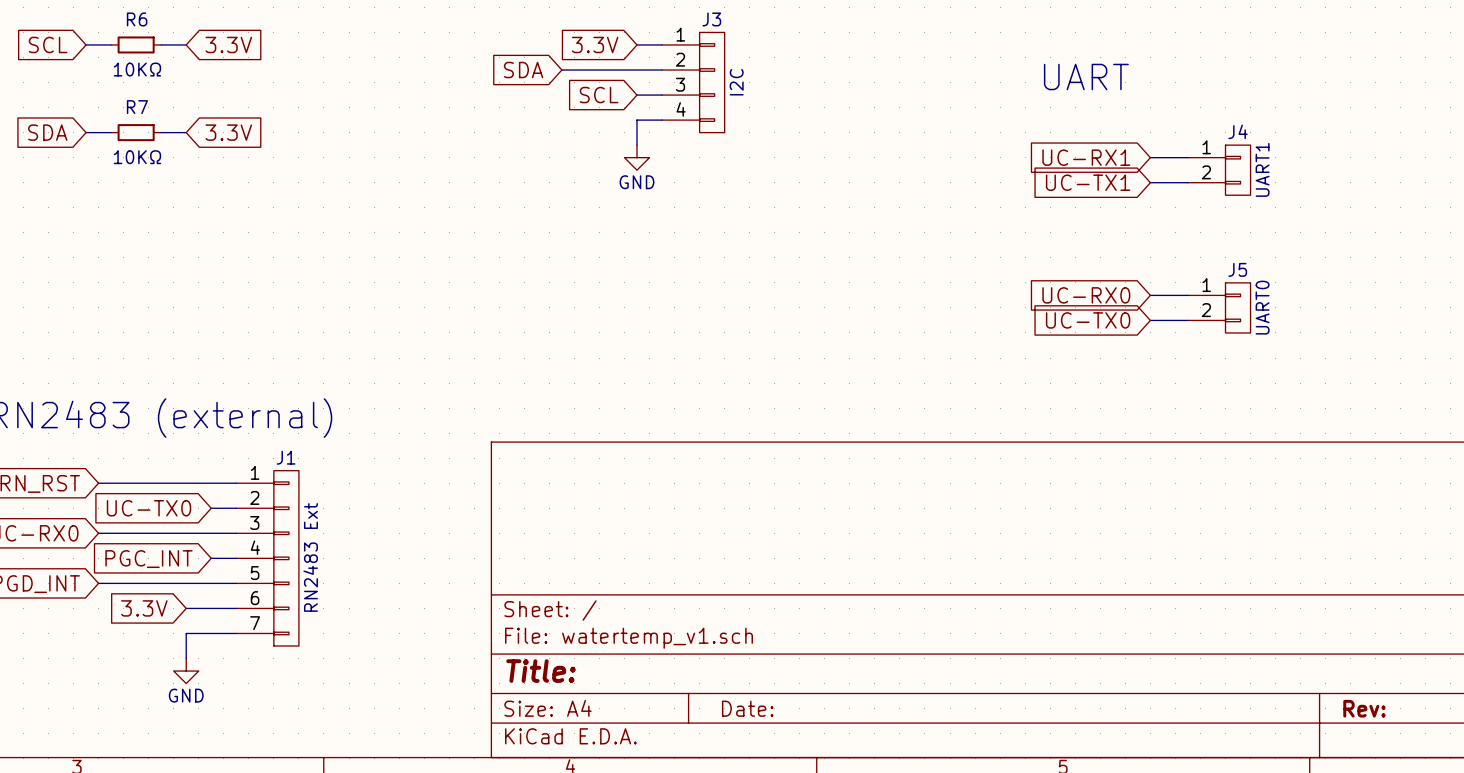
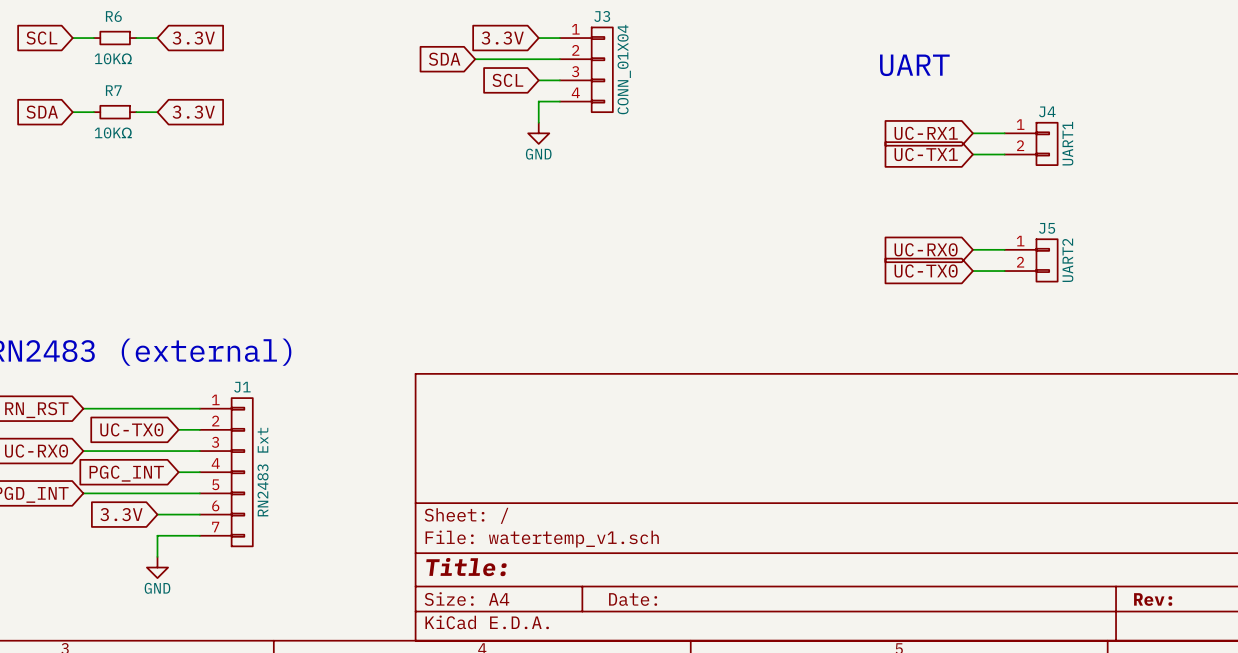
J3 value: I2C (736, 82) -> CONN_01X04 (624, 69)
J5 value: UART0 (1262, 307) -> UART2 (1067, 260)

